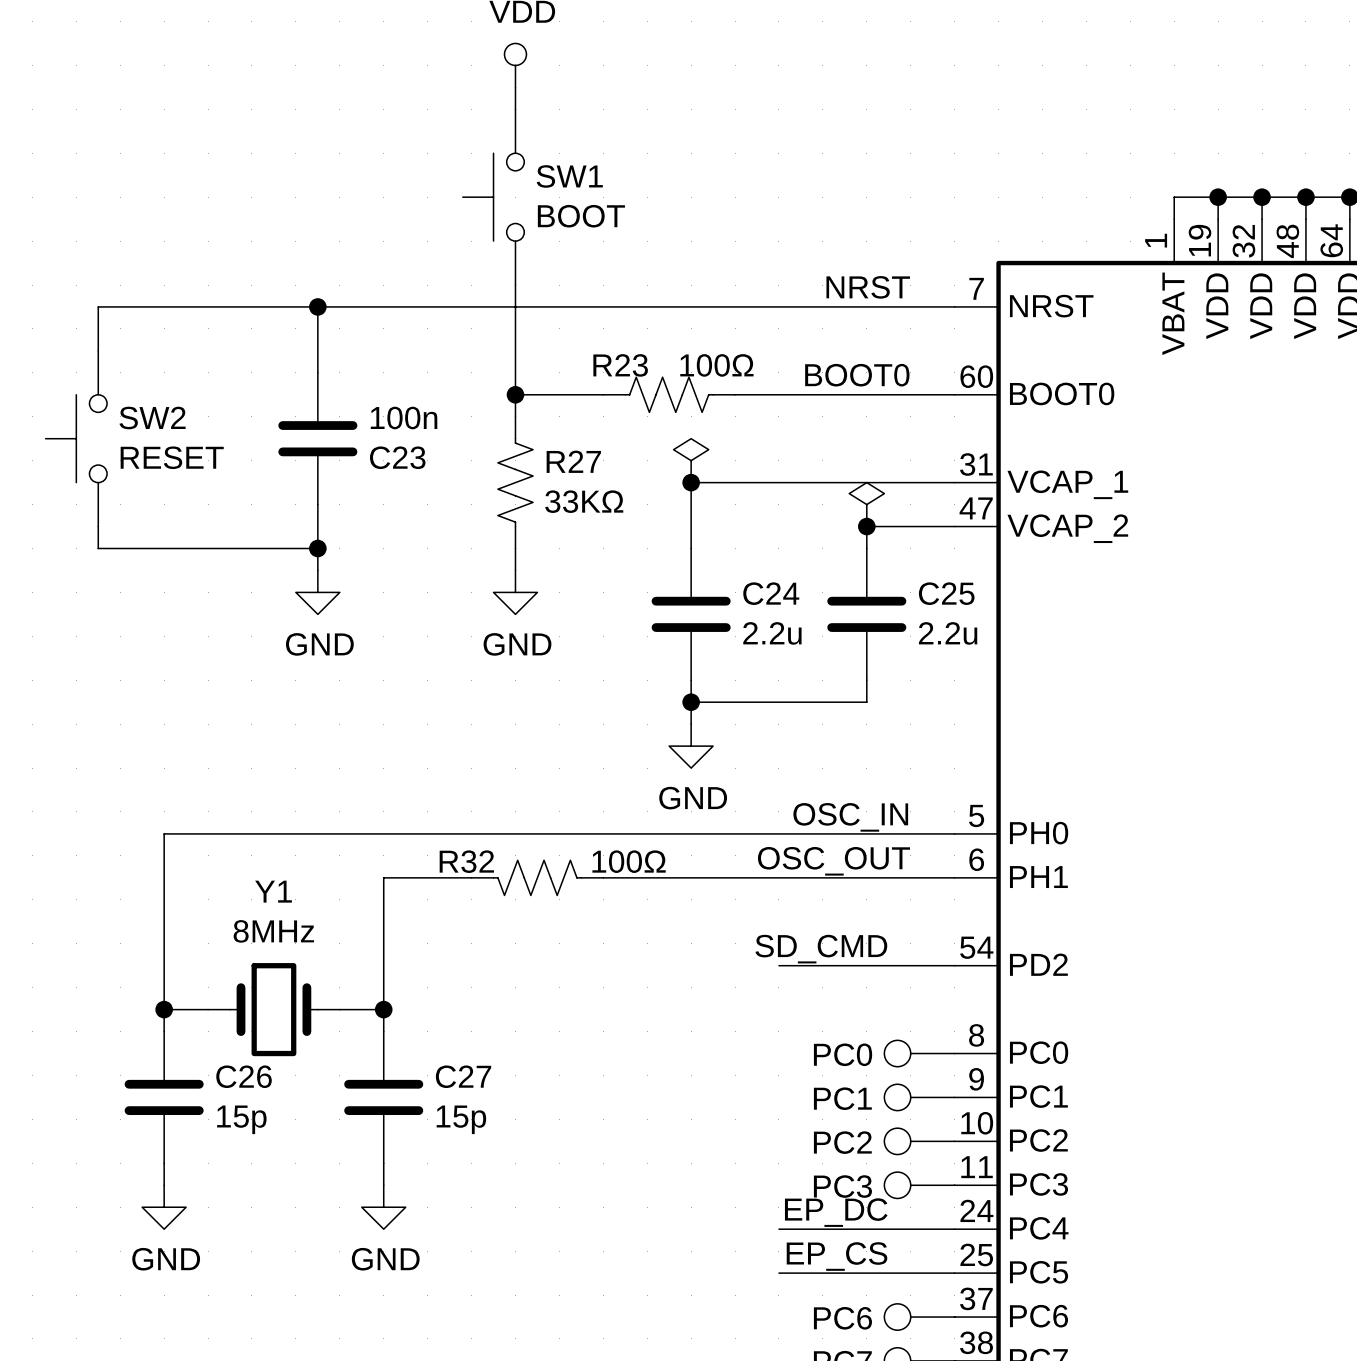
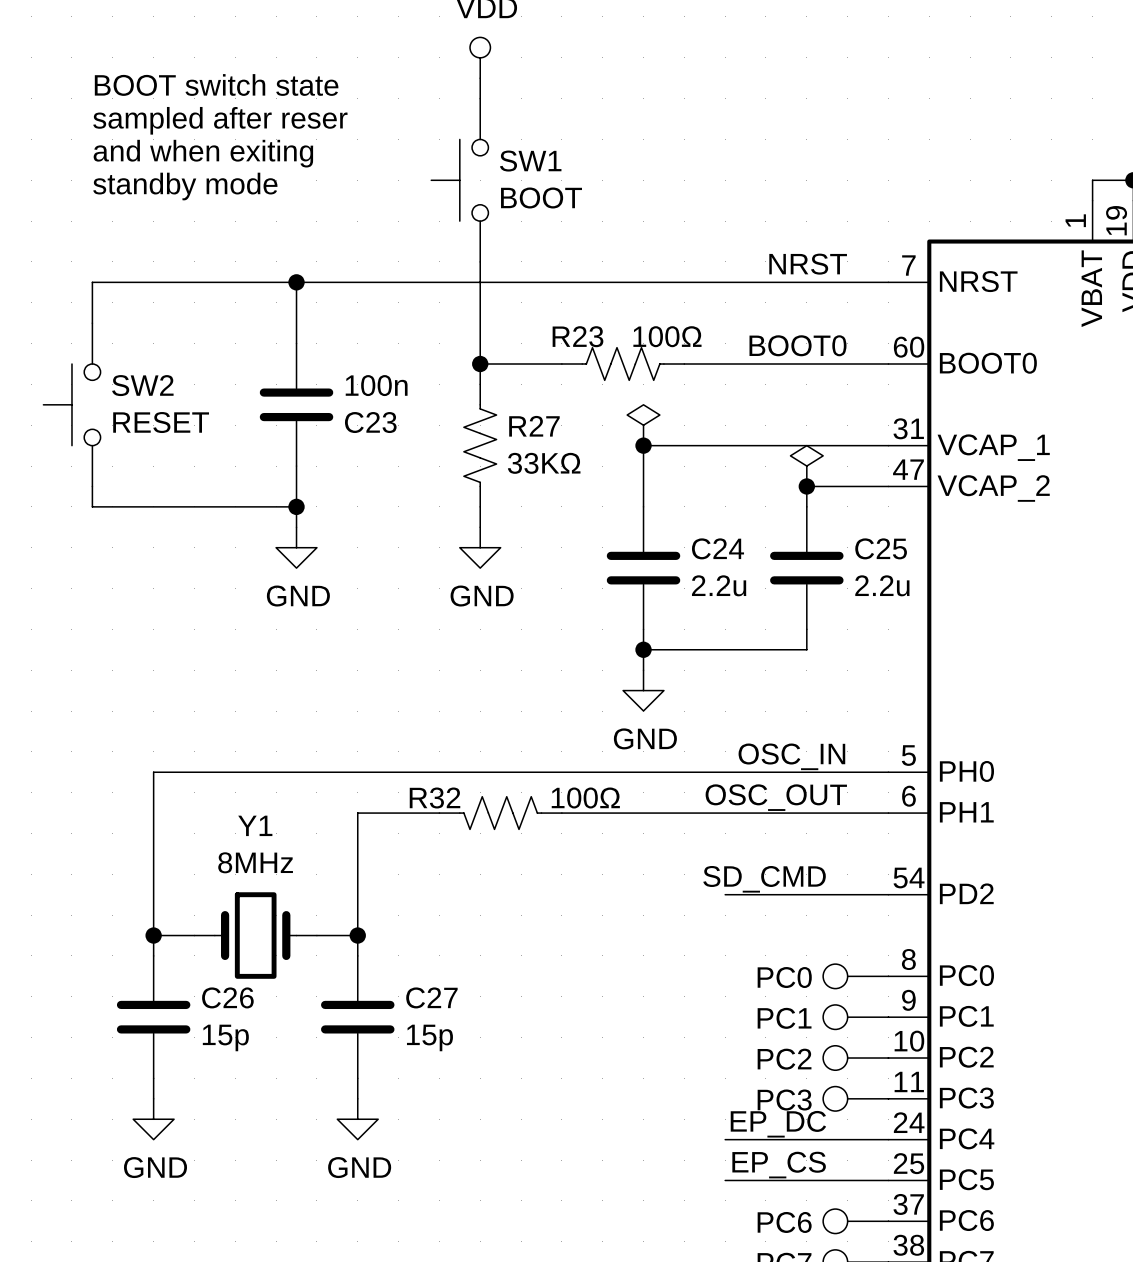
text: none -> BOOT switch state (216, 84)
text: none -> sampled after reser (220, 120)
text: none -> and when exiting (203, 153)
text: none -> standby mode (185, 186)

